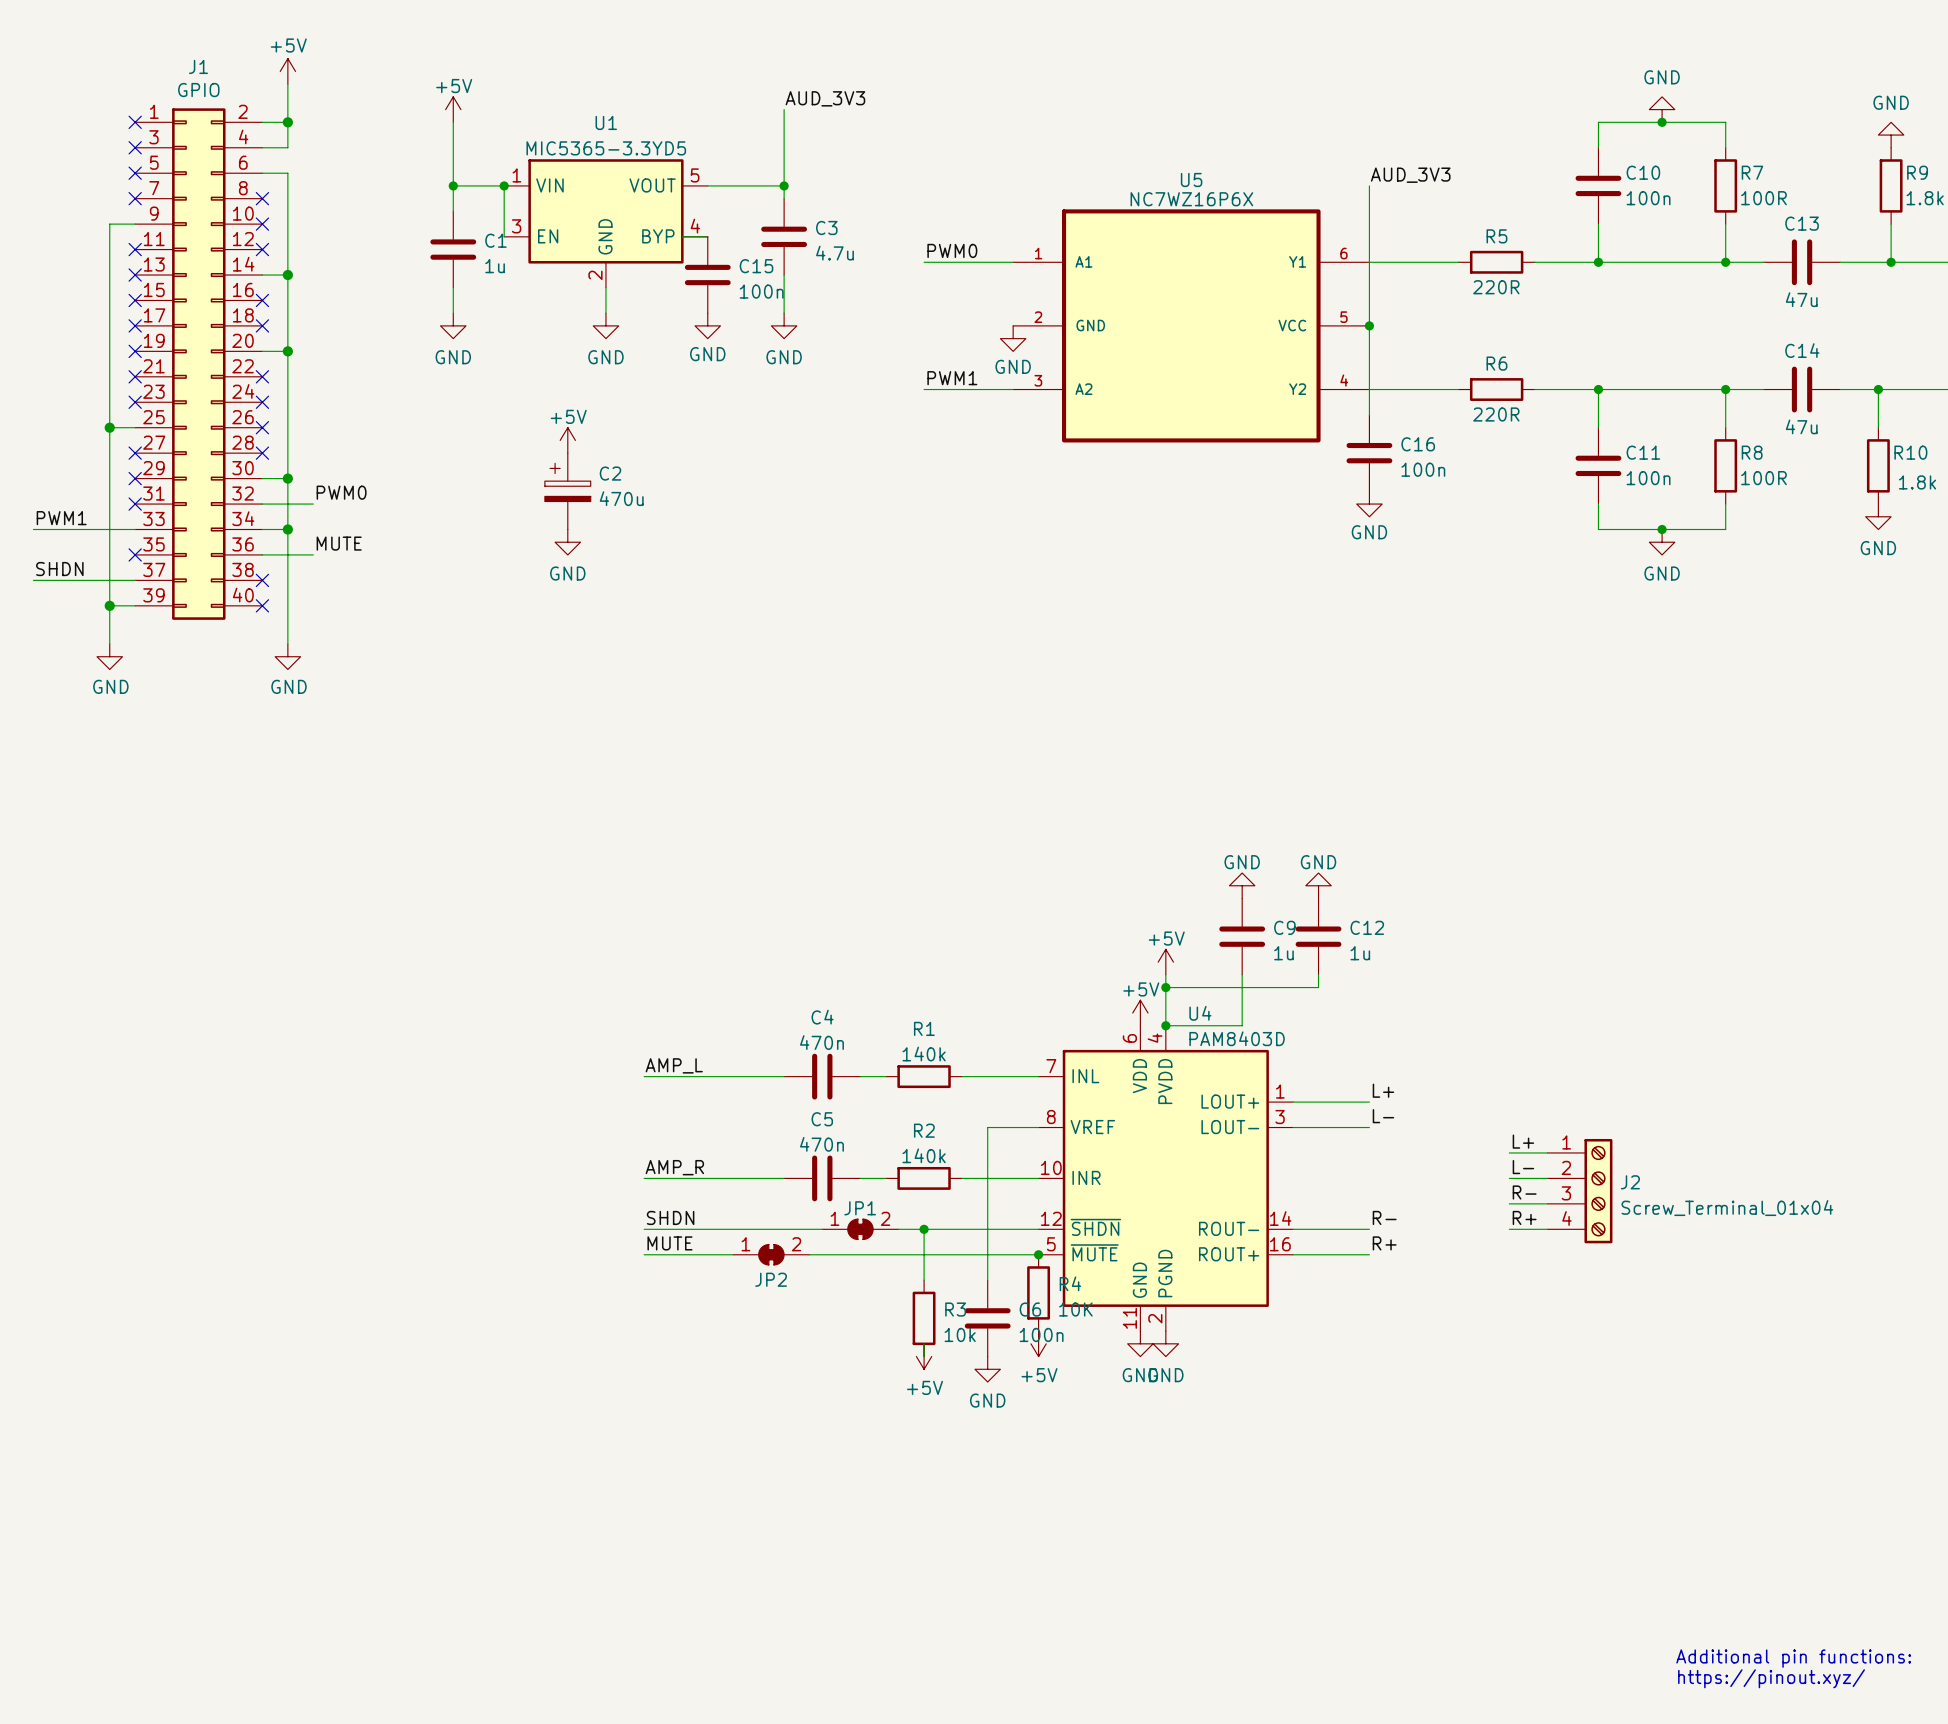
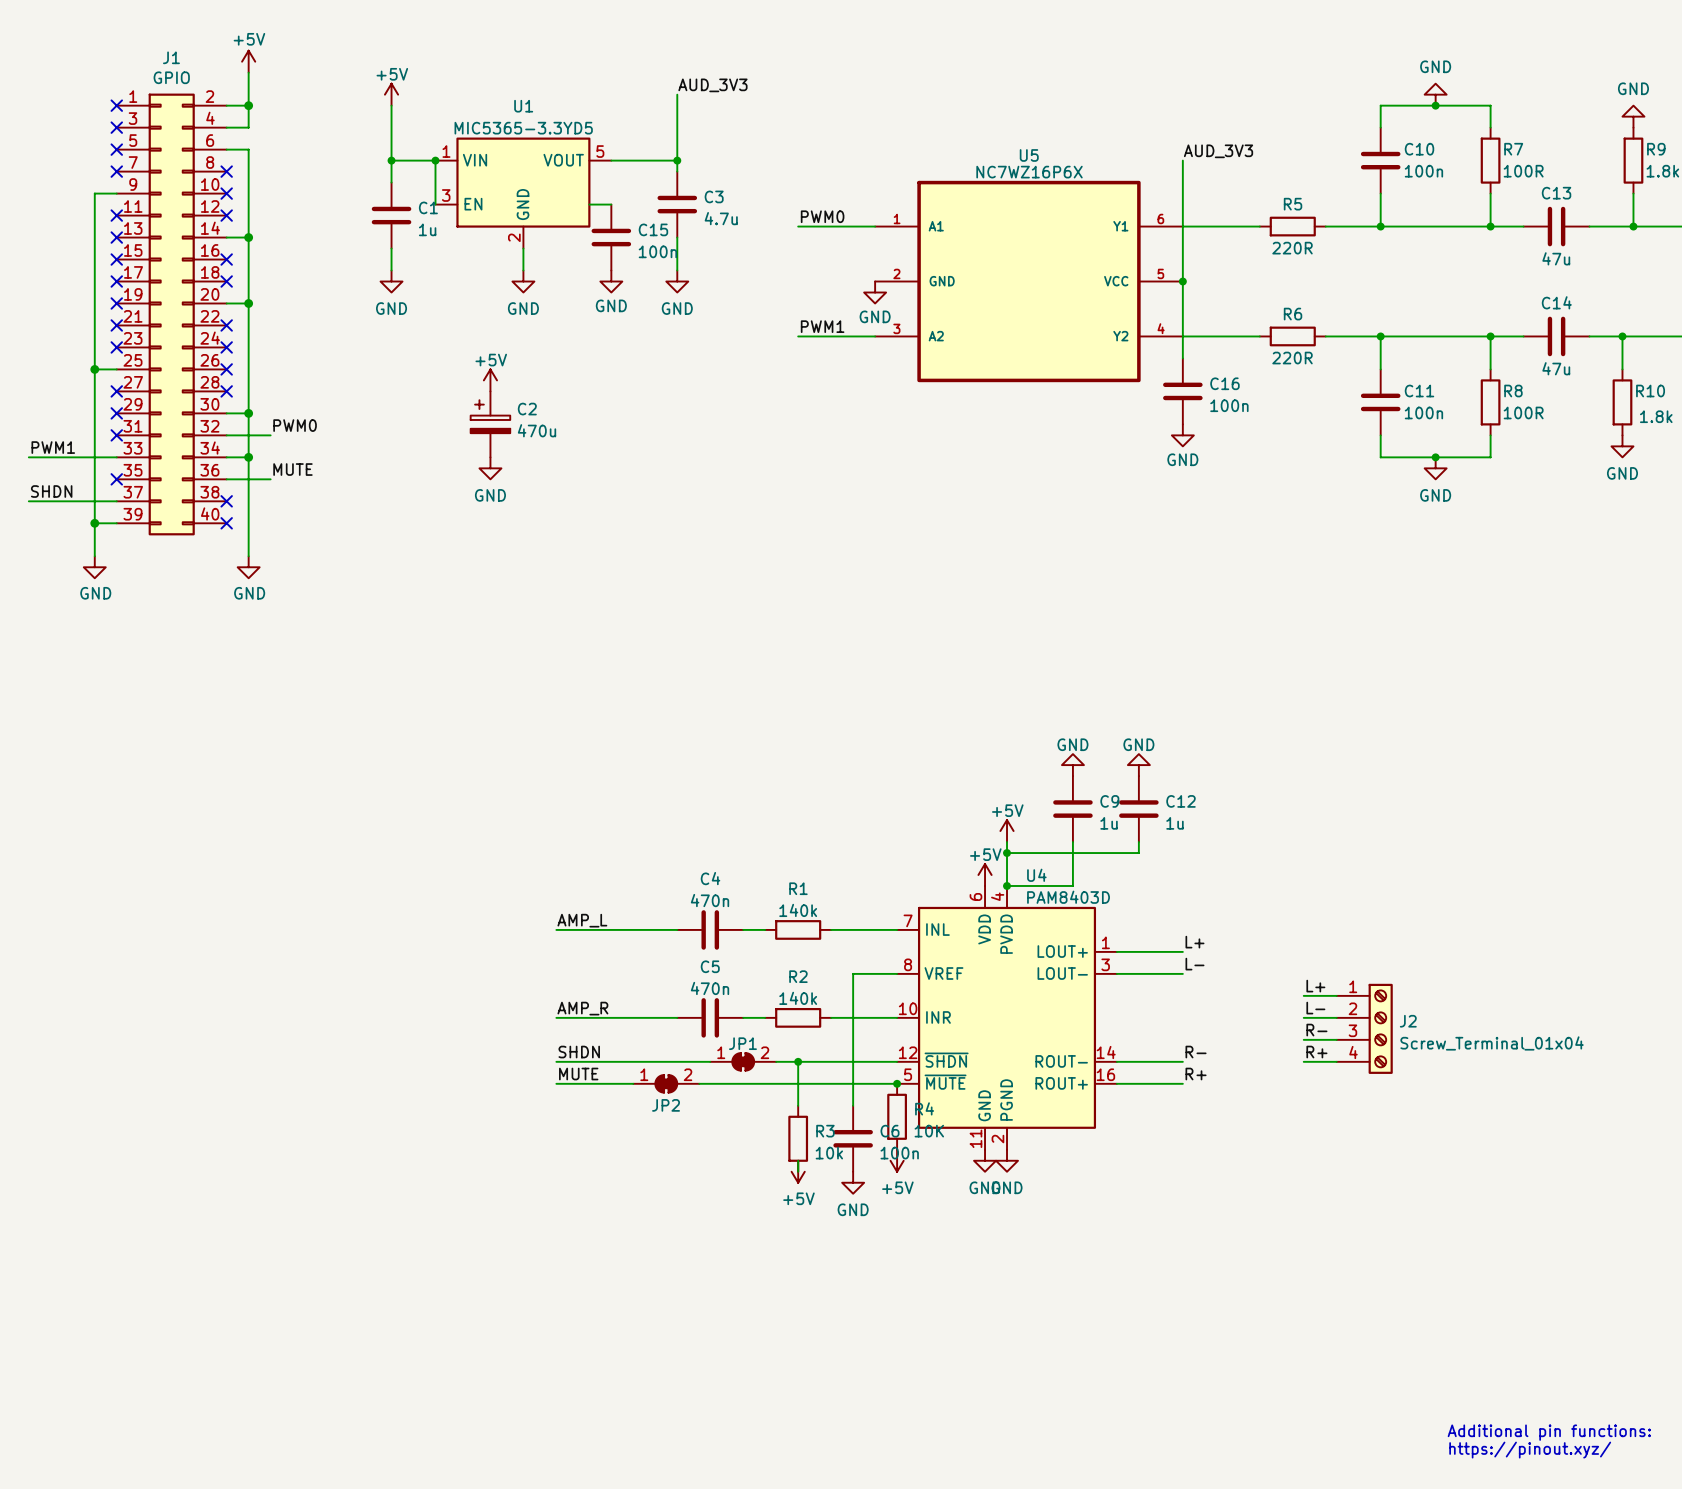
U1 symbol: [504, 159, 708, 288] -> [435, 137, 612, 249]

